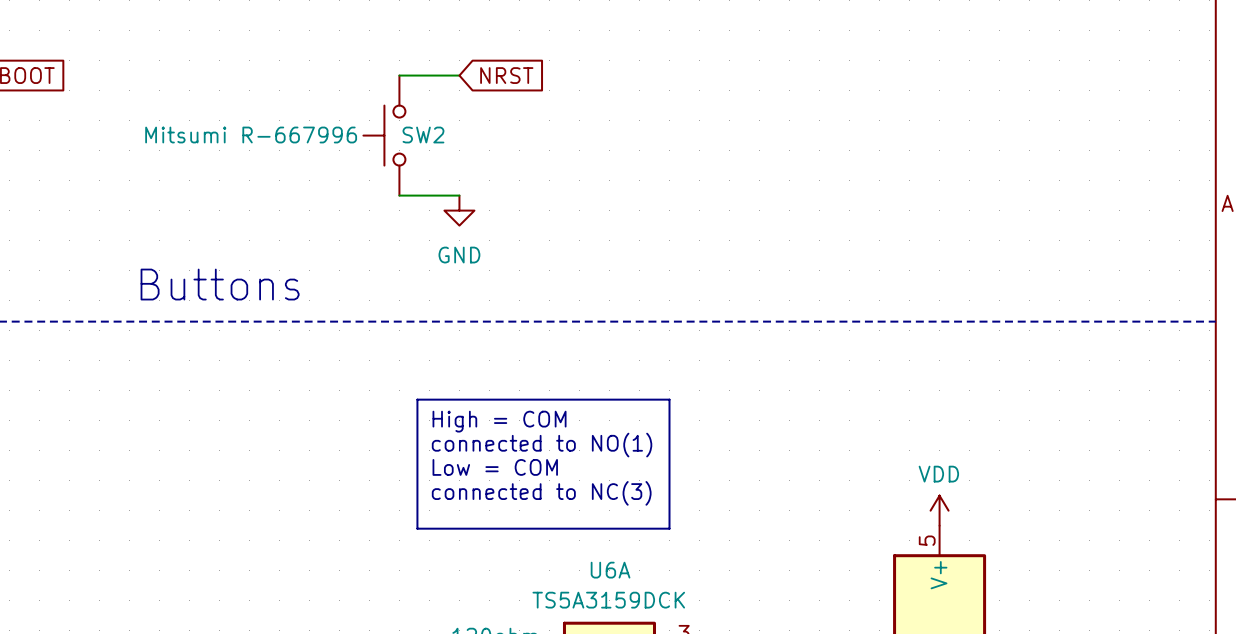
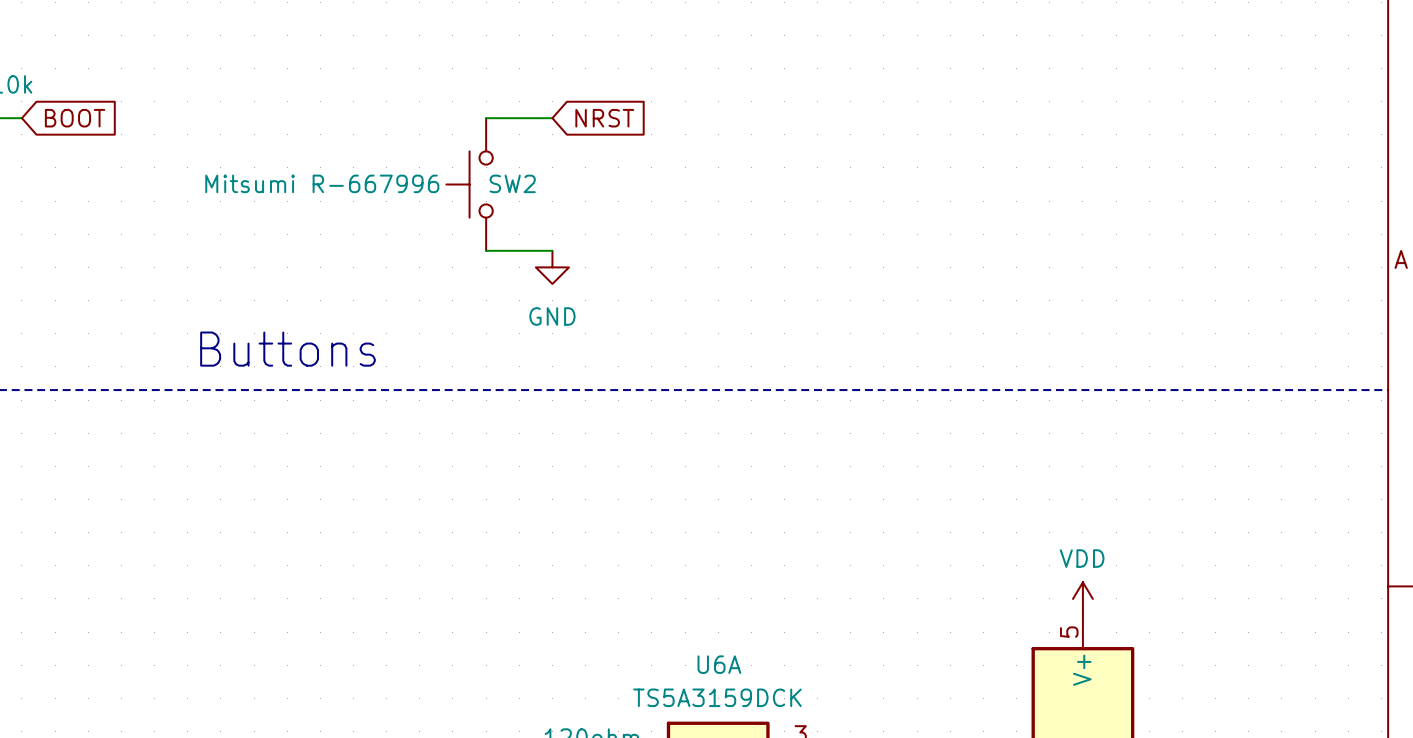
line: (417, 399) (669, 399) (669, 528) (417, 528) (417, 399) -> none
text: High = COM (499, 421) -> none
text: connected to NO(1) (542, 445) -> none
text: Low = COM (495, 467) -> none
text: connected to NC(3) (541, 493) -> none

